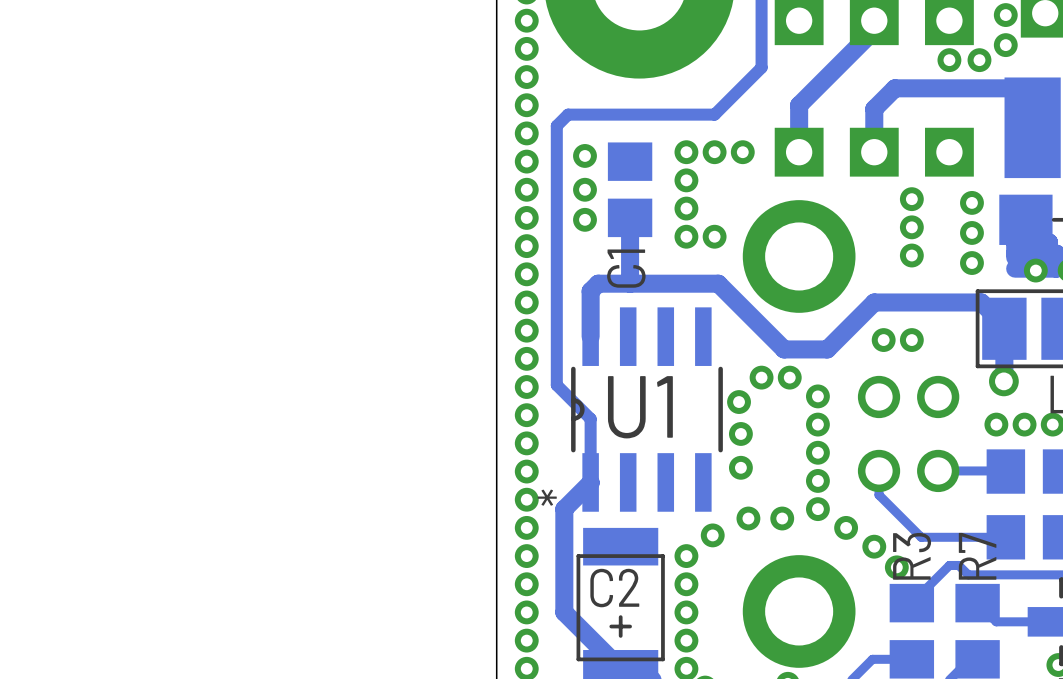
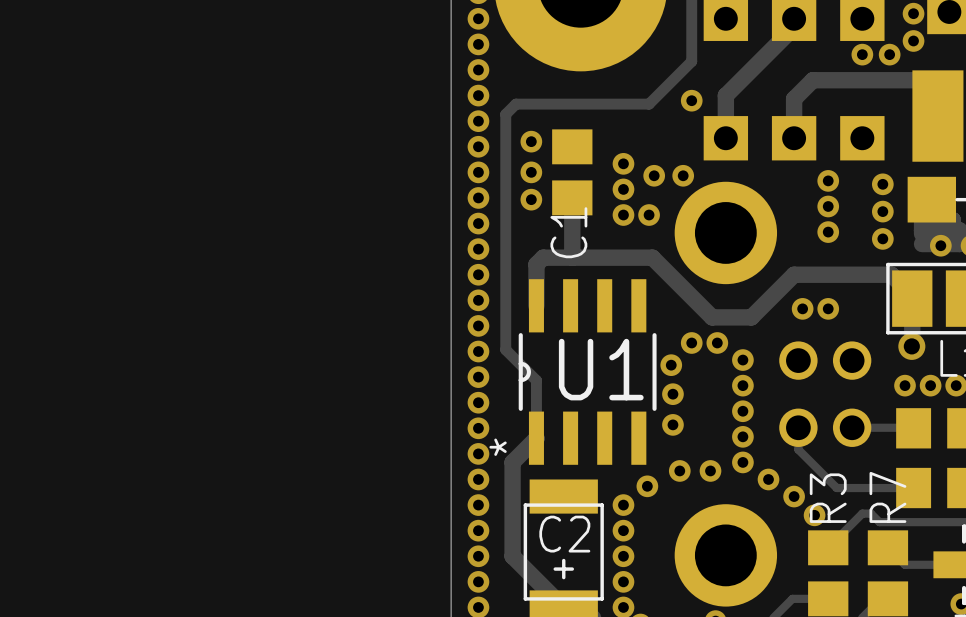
via: none -> (691, 100)
via: (686, 152) -> none
via: (714, 152) -> none
via: (742, 152) -> none
via: none -> (654, 175)
via: none -> (683, 175)

